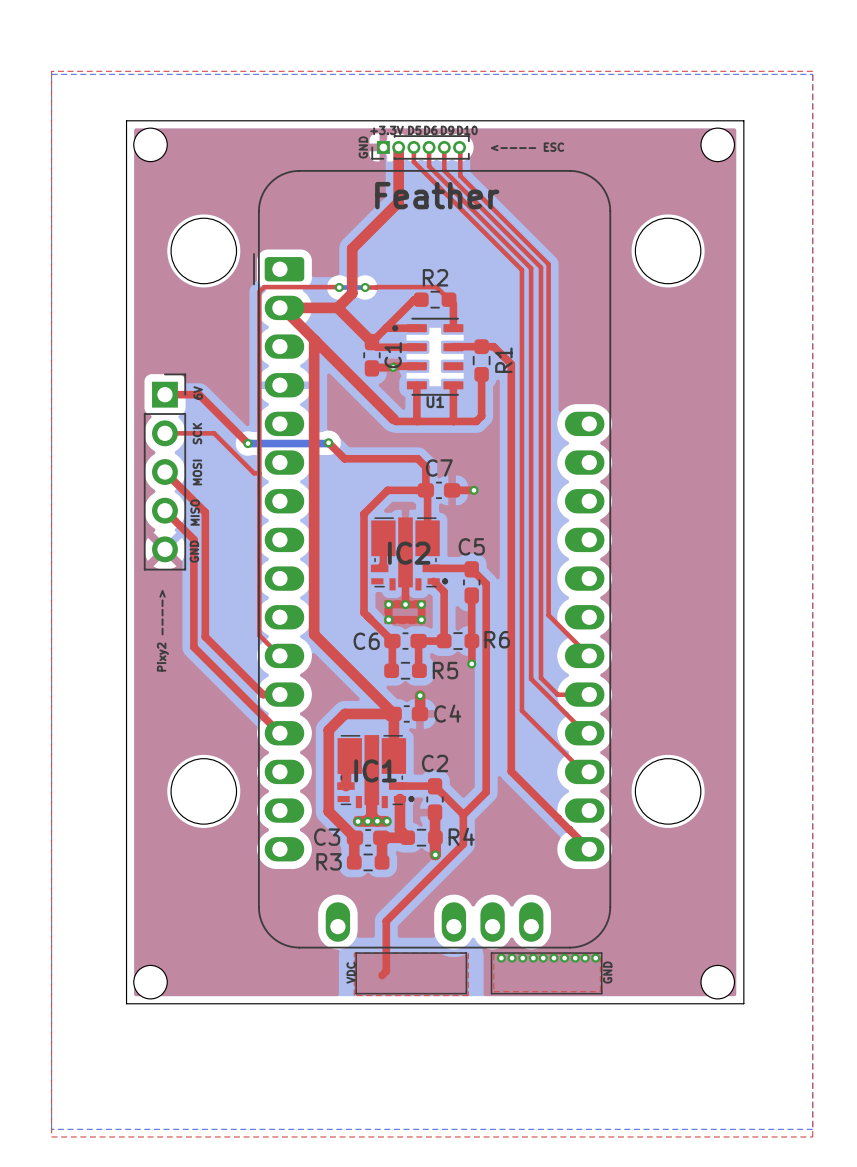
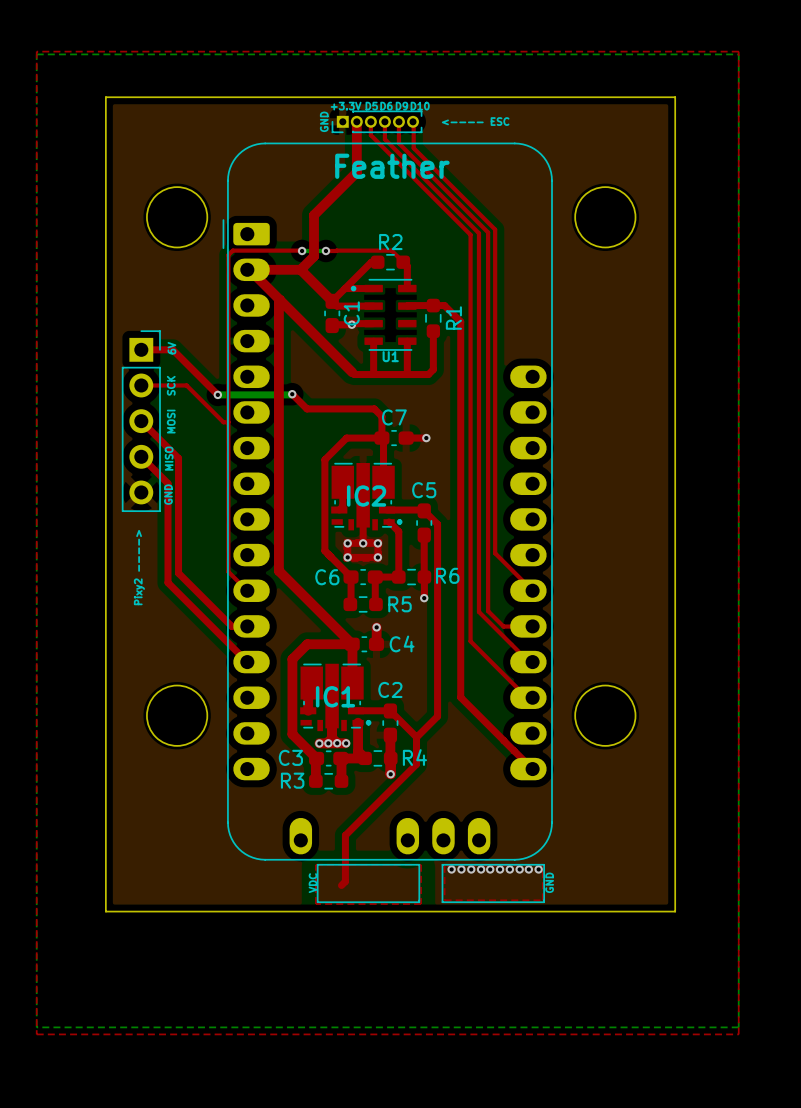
part: (150, 144) -> none
part: (717, 144) -> none
part: (150, 982) -> none
part: (717, 982) -> none

